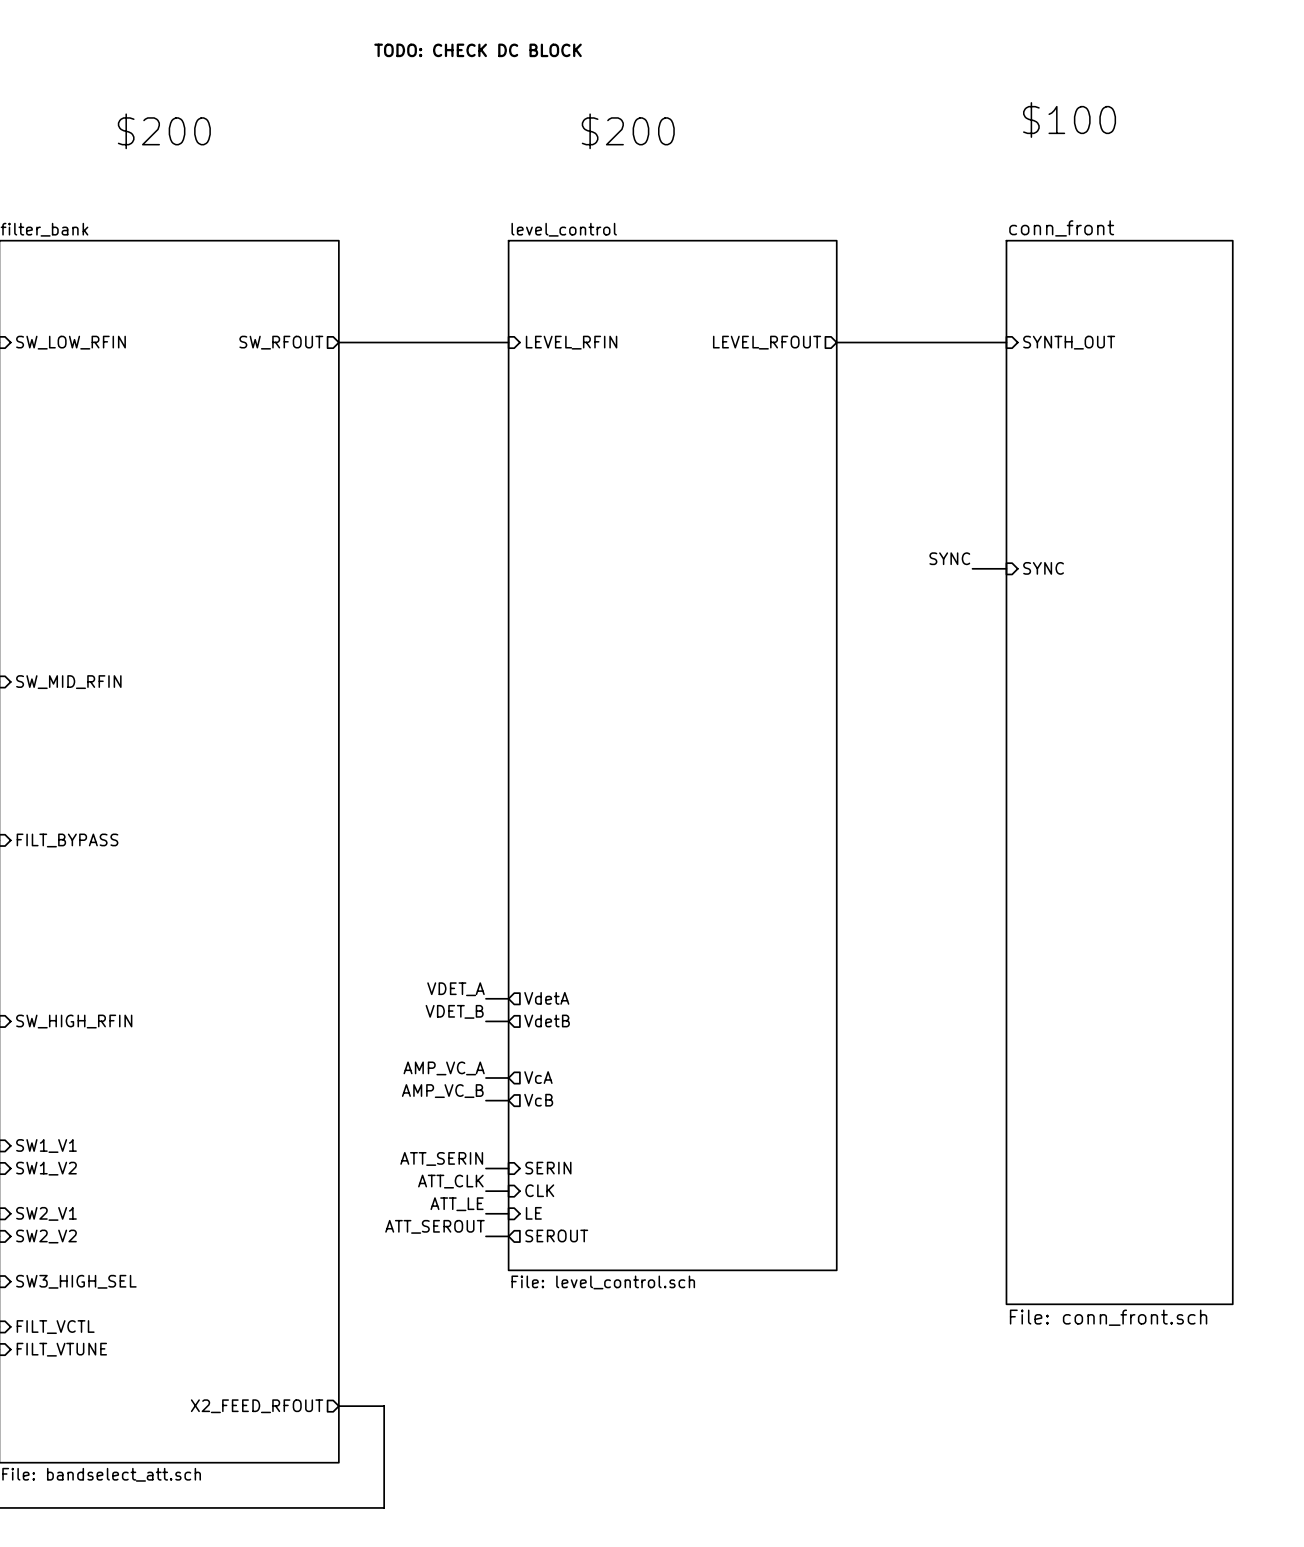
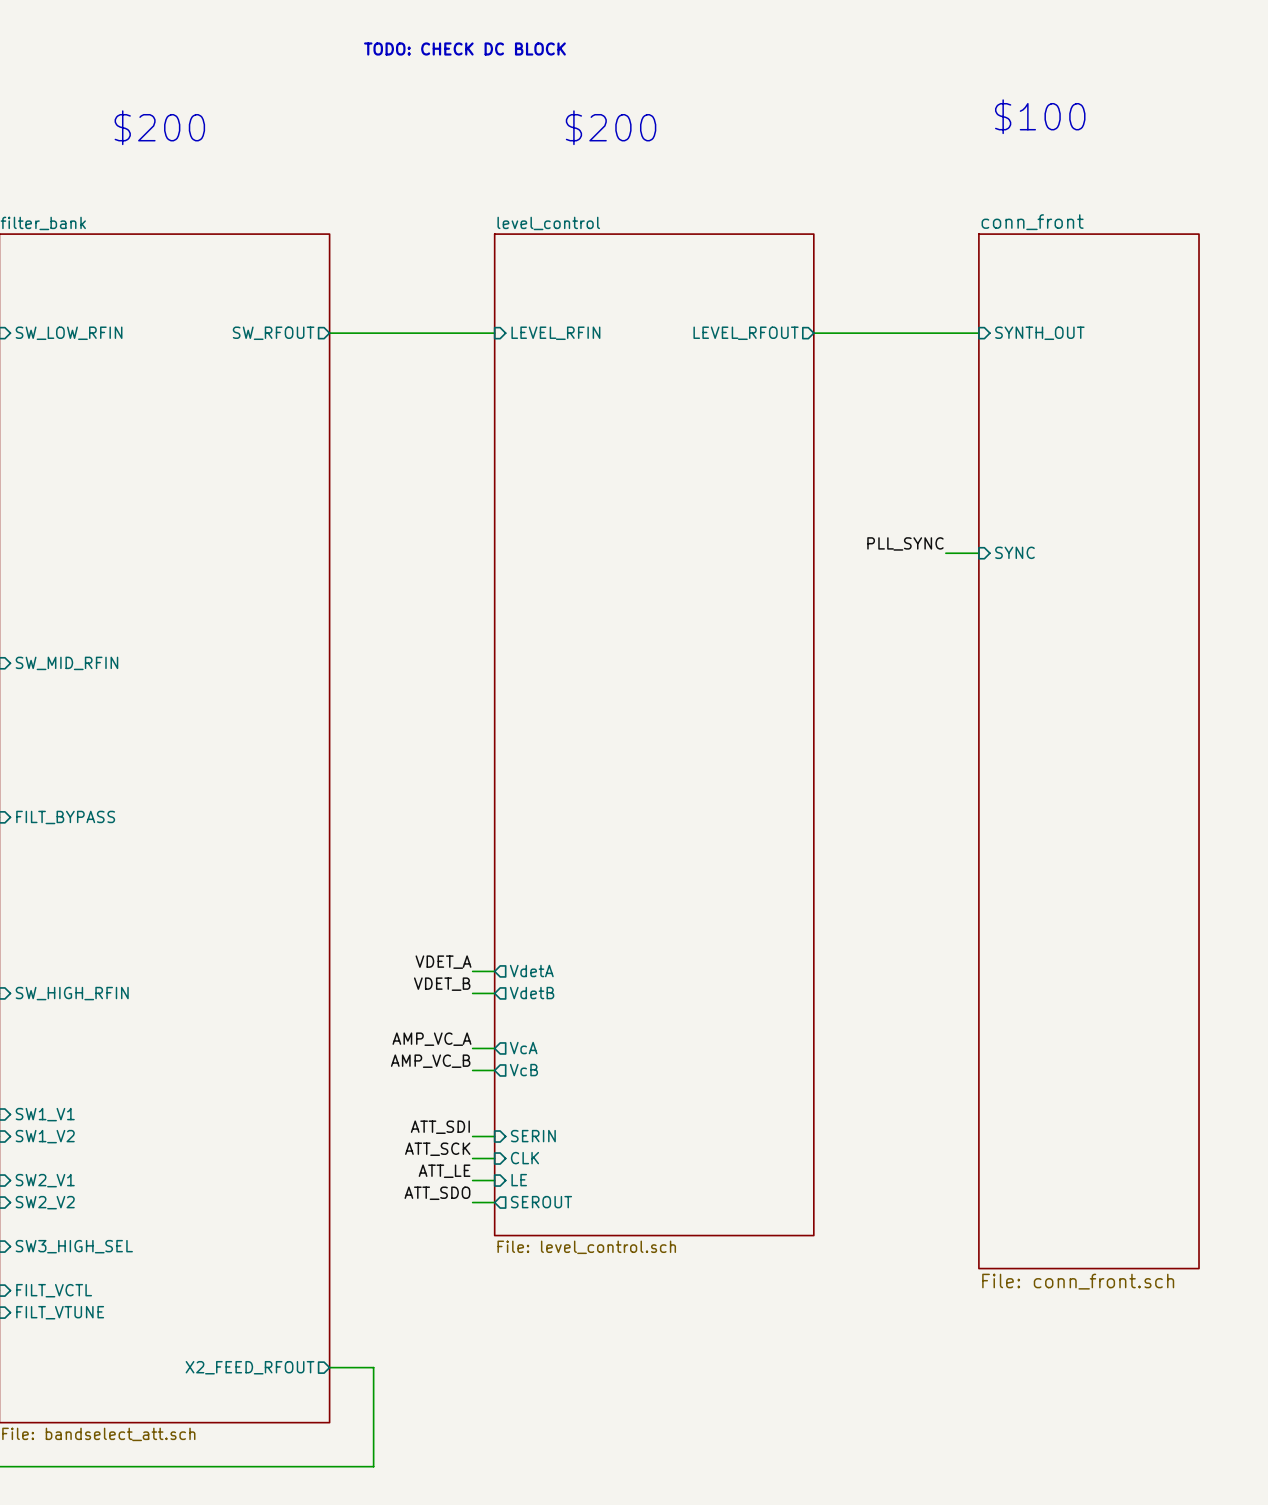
label: SYNC (949, 558) -> PLL_SYNC (905, 543)
label: ATT_SERIN (441, 1158) -> ATT_SDI (440, 1127)
label: ATT_CLK (450, 1181) -> ATT_SCK (437, 1149)
label: ATT_SEROUT (434, 1226) -> ATT_SDO (437, 1193)

